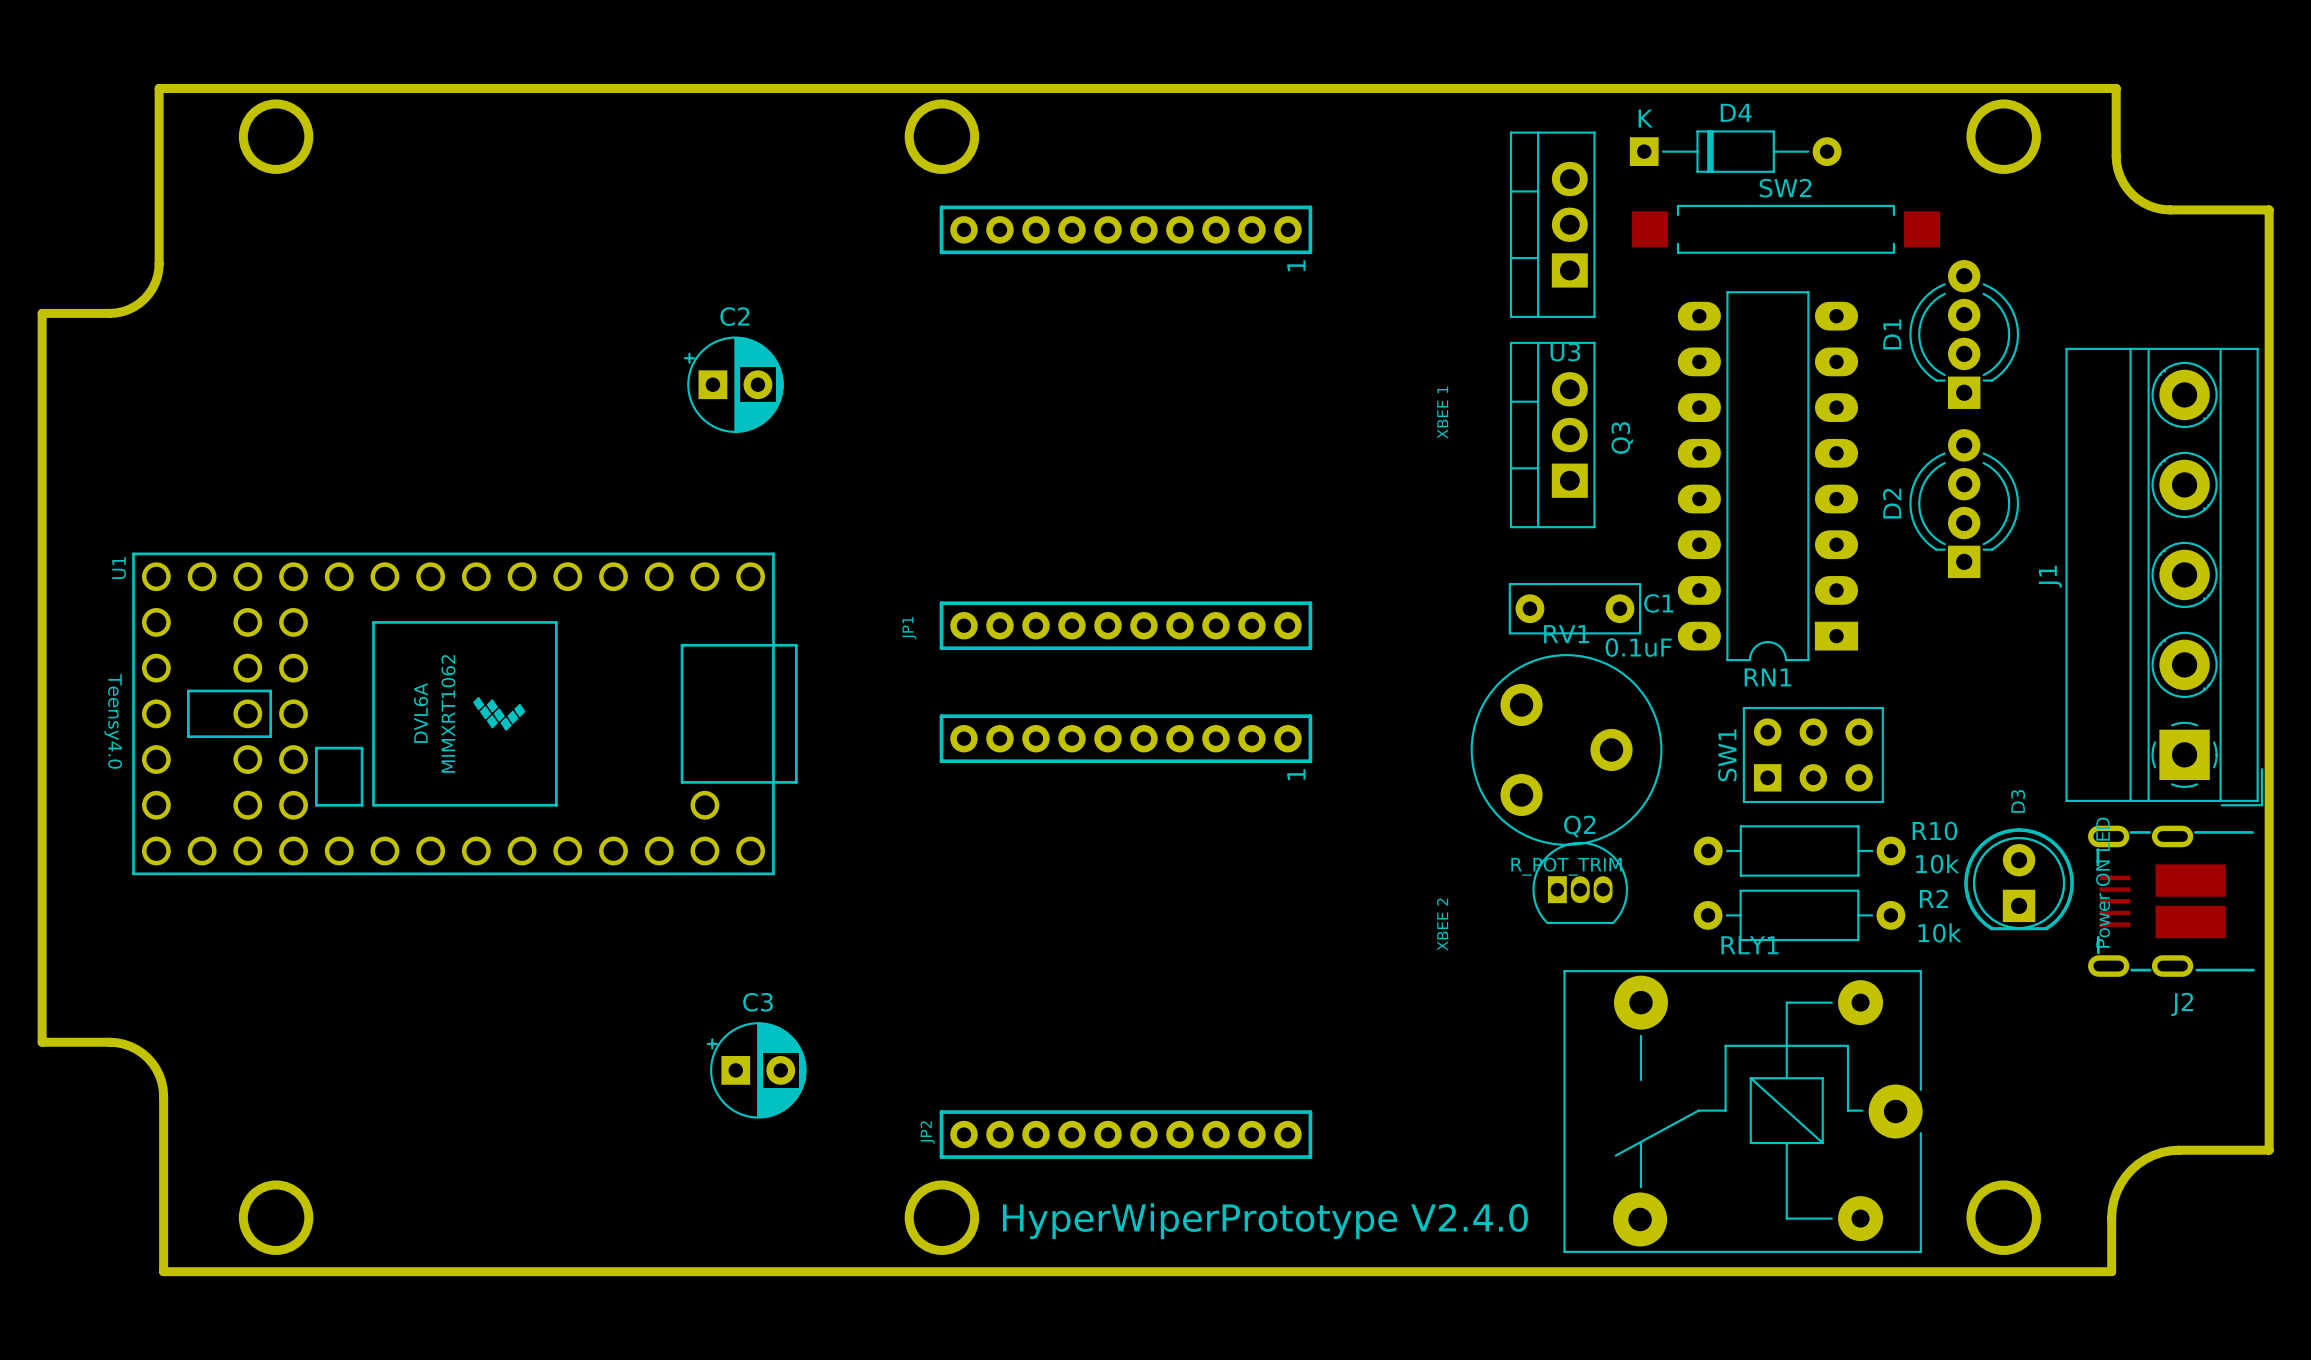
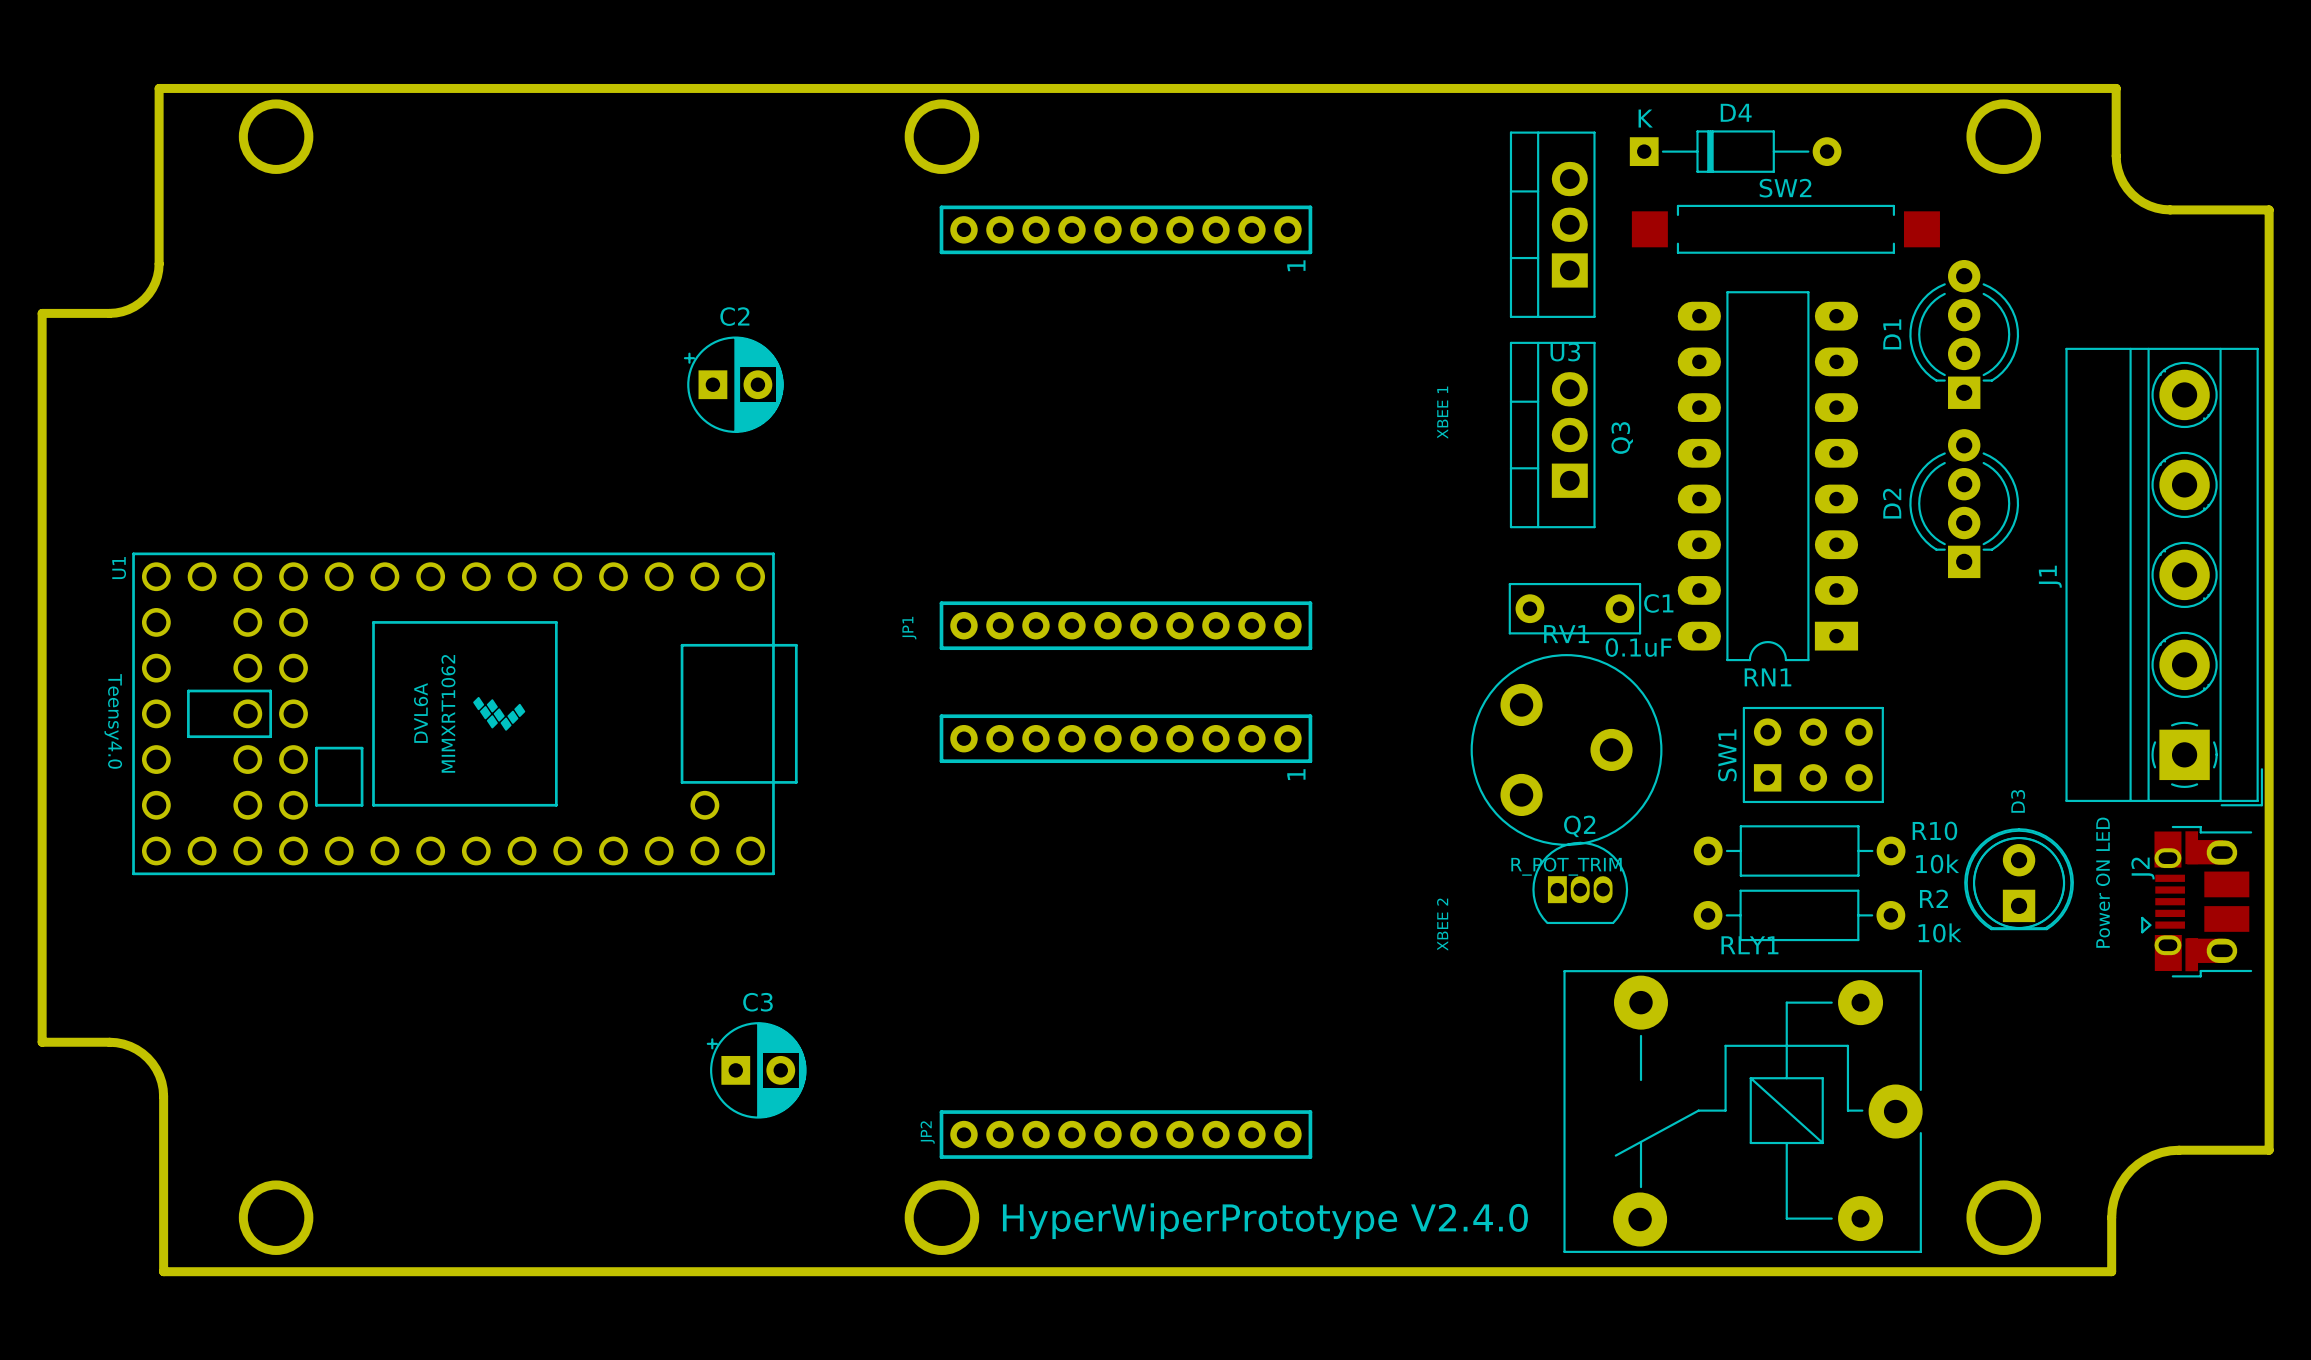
J2 footprint: [2087, 825, 2255, 977] -> [2141, 825, 2253, 978]
J2 name position: J2 (2182, 1004) -> J2 (2142, 868)

